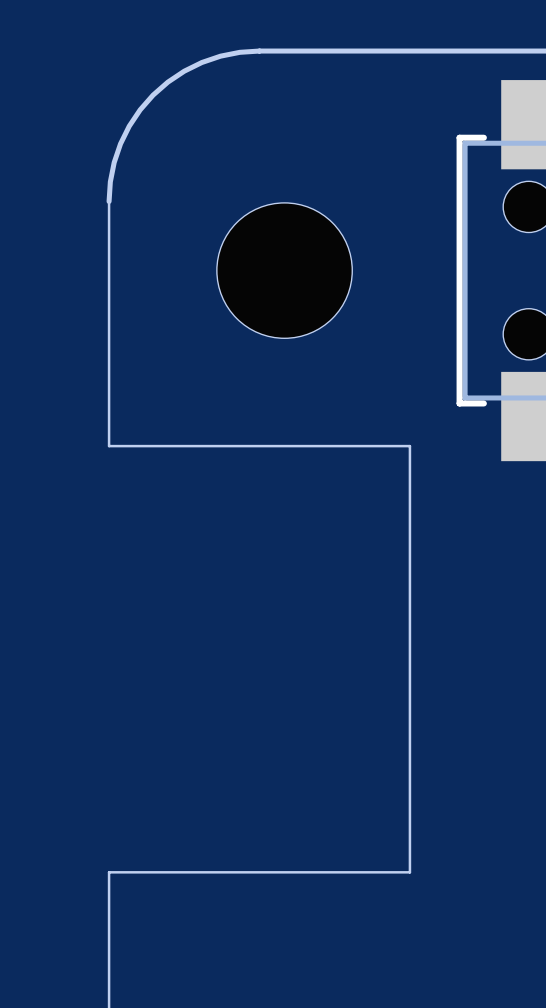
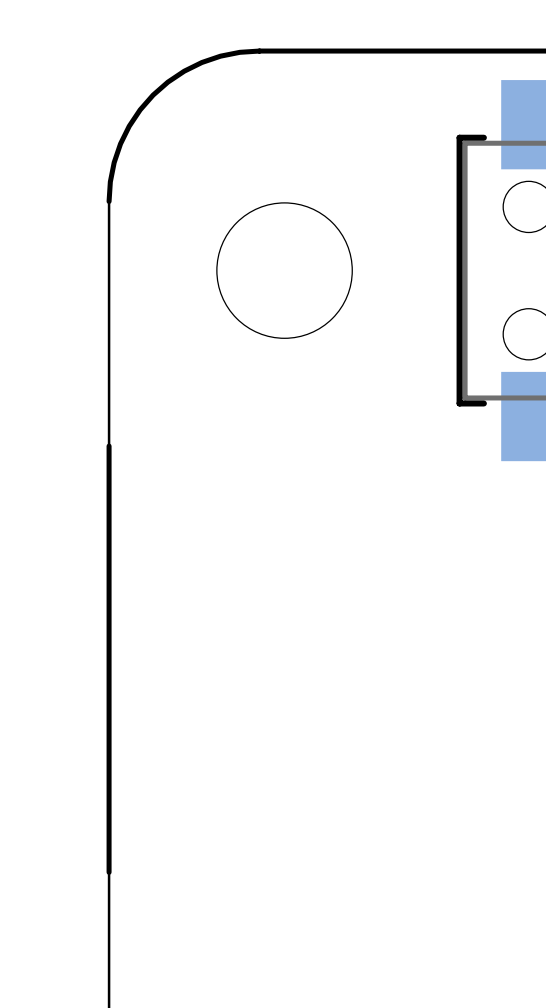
board edge: (109, 446) (409, 446) (409, 872) (109, 872) -> (109, 446) (109, 872)

